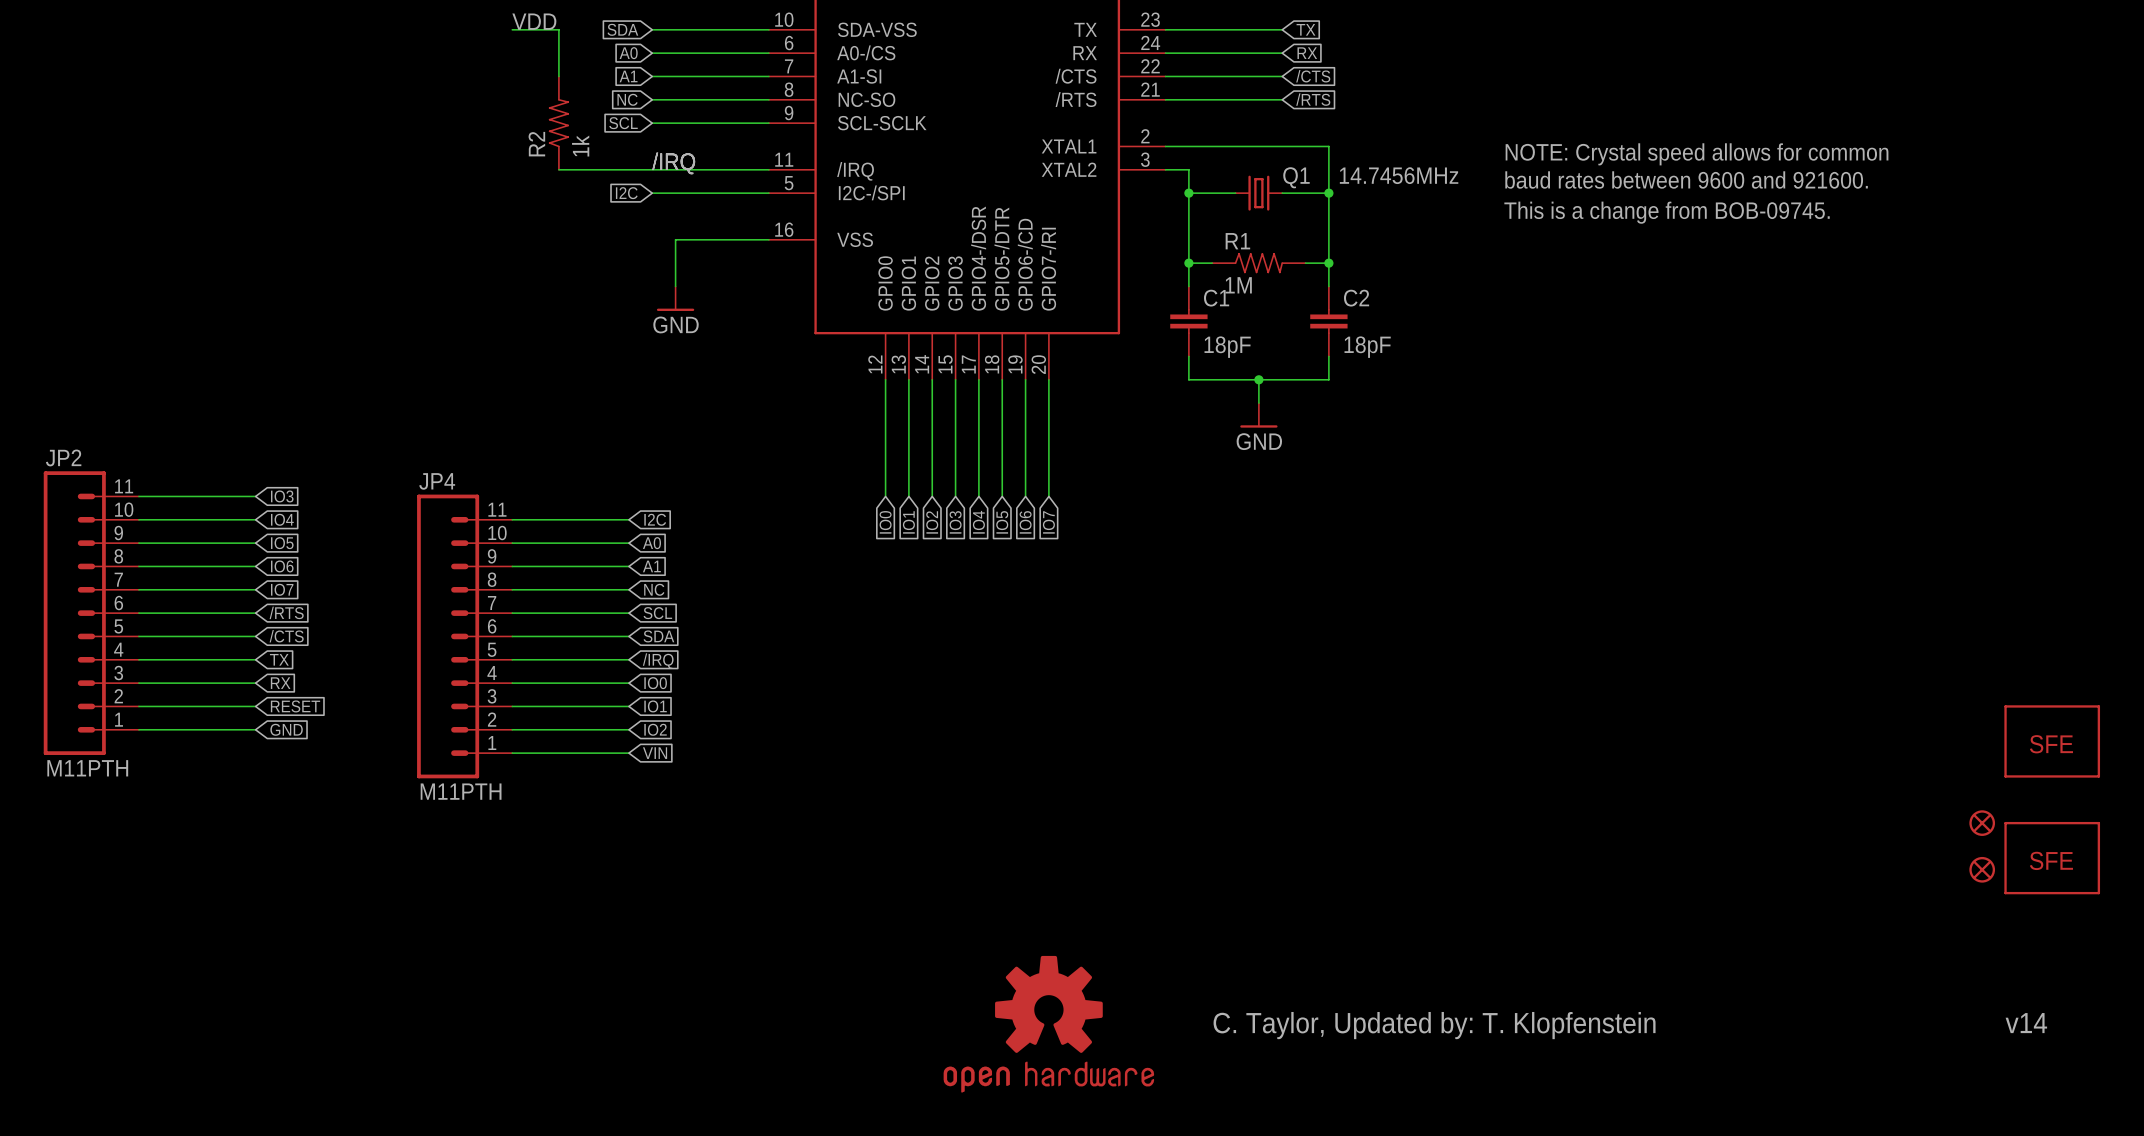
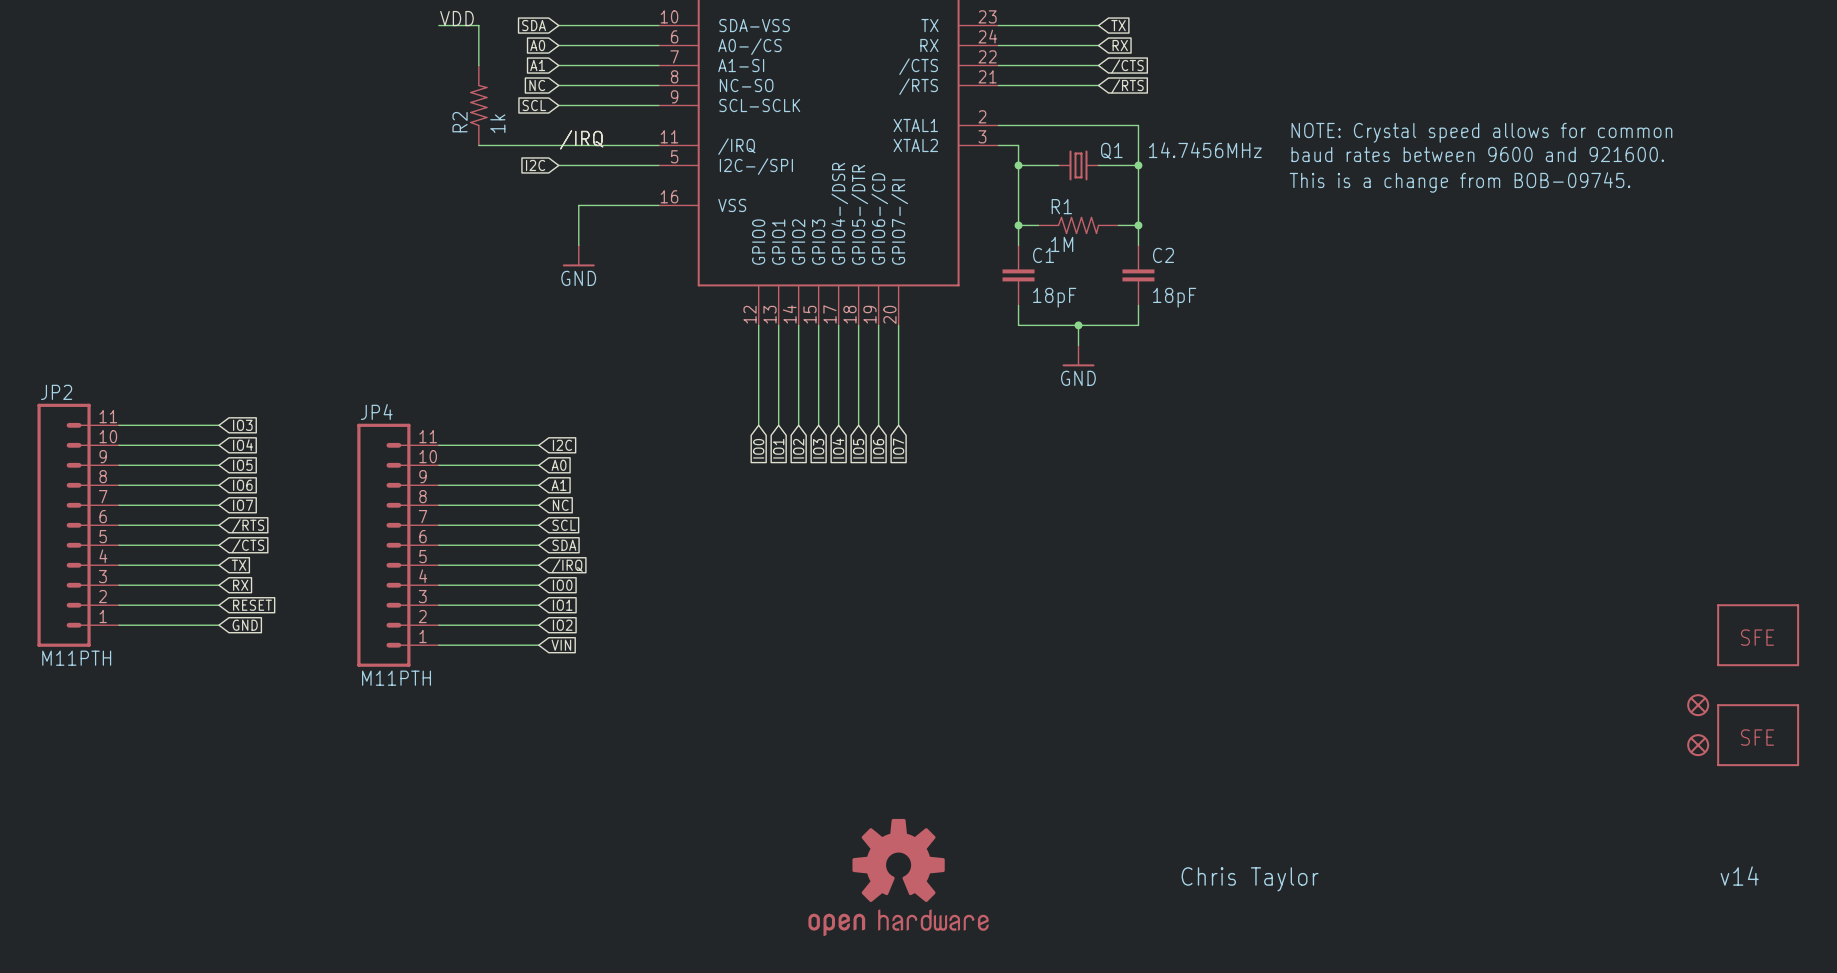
text: C. Taylor, Updated by: T. Klopfenstein (1434, 1025) -> none
text: none -> Chris Taylor (1250, 879)

